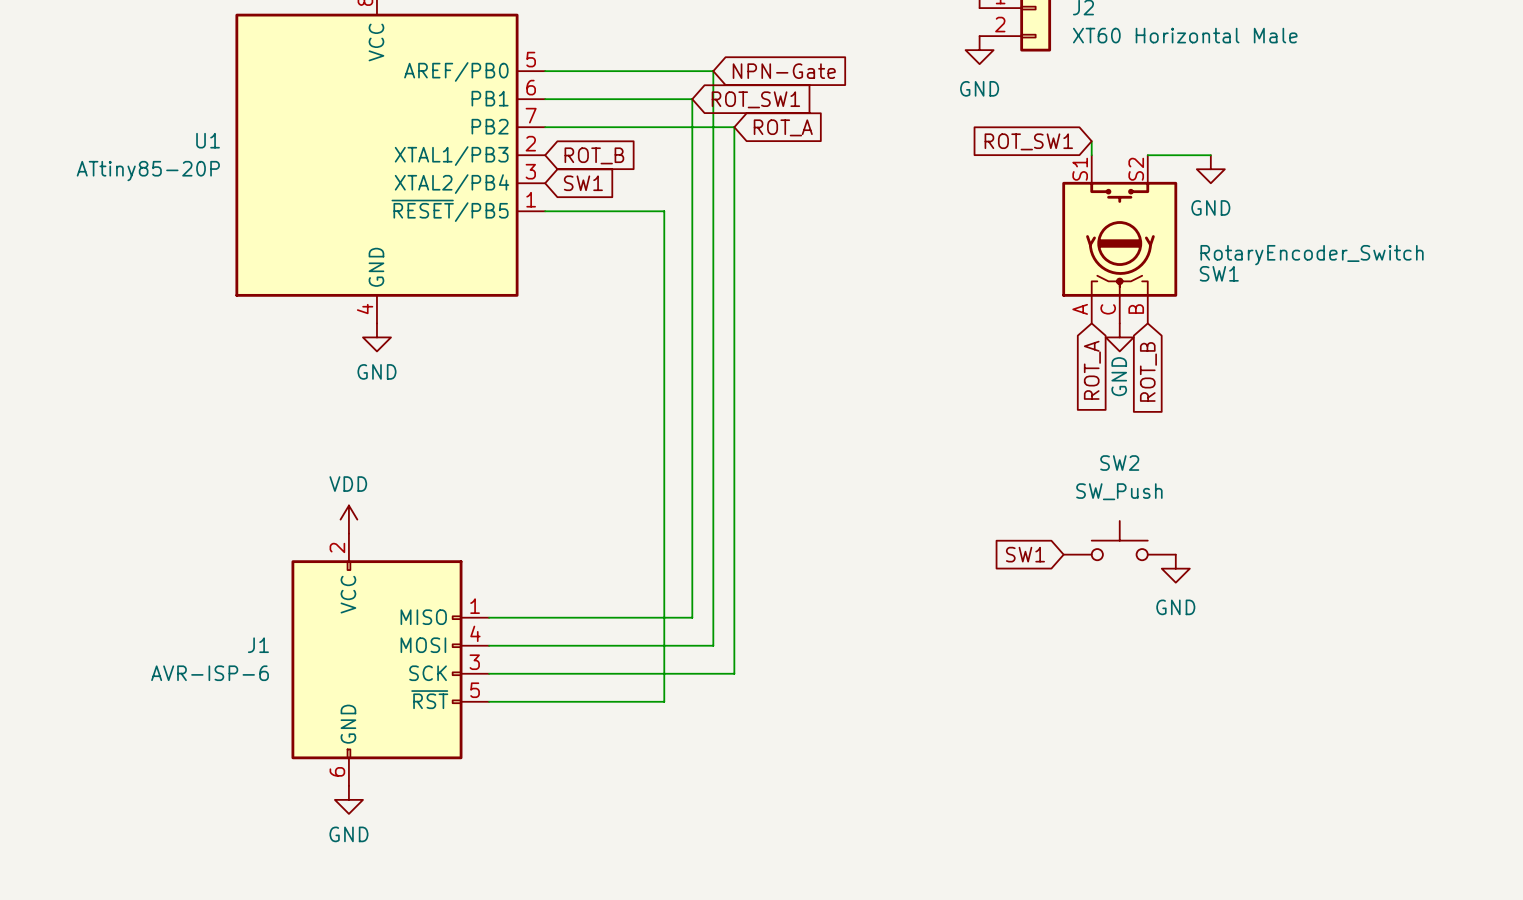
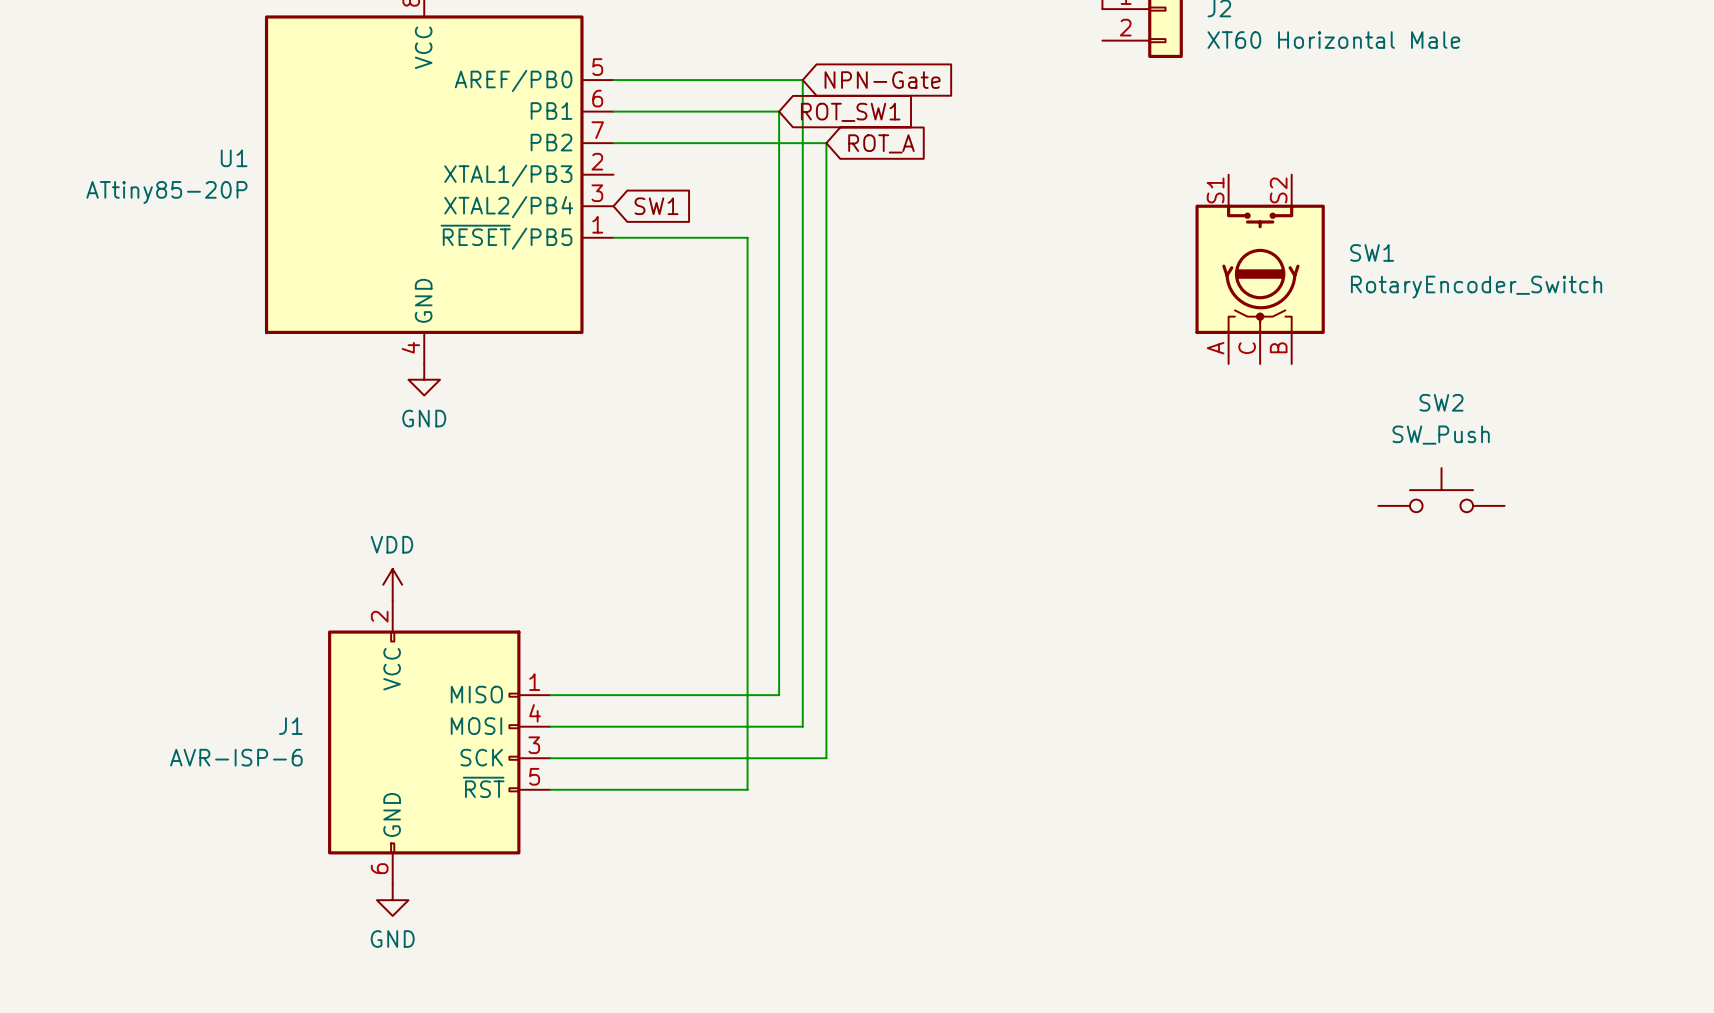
power symbol: GND (979, 50) -> none
global label: ROT_SW1 (1028, 141) -> none
wire: (1091, 141) (1091, 155) -> none
global label: ROT_B (594, 155) -> none
wire: (1147, 155) (1210, 155) -> none
power symbol: GND (1210, 169) -> none
SW1 name position: SW1 (1219, 273) -> SW1 (1372, 252)
power symbol: GND (1119, 337) -> none
global label: ROT_A (1092, 370) -> none
global label: ROT_B (1148, 371) -> none
SW2 position: (1119, 540) -> (1441, 490)
global label: SW1 (1025, 554) -> none
power symbol: GND (1175, 568) -> none

